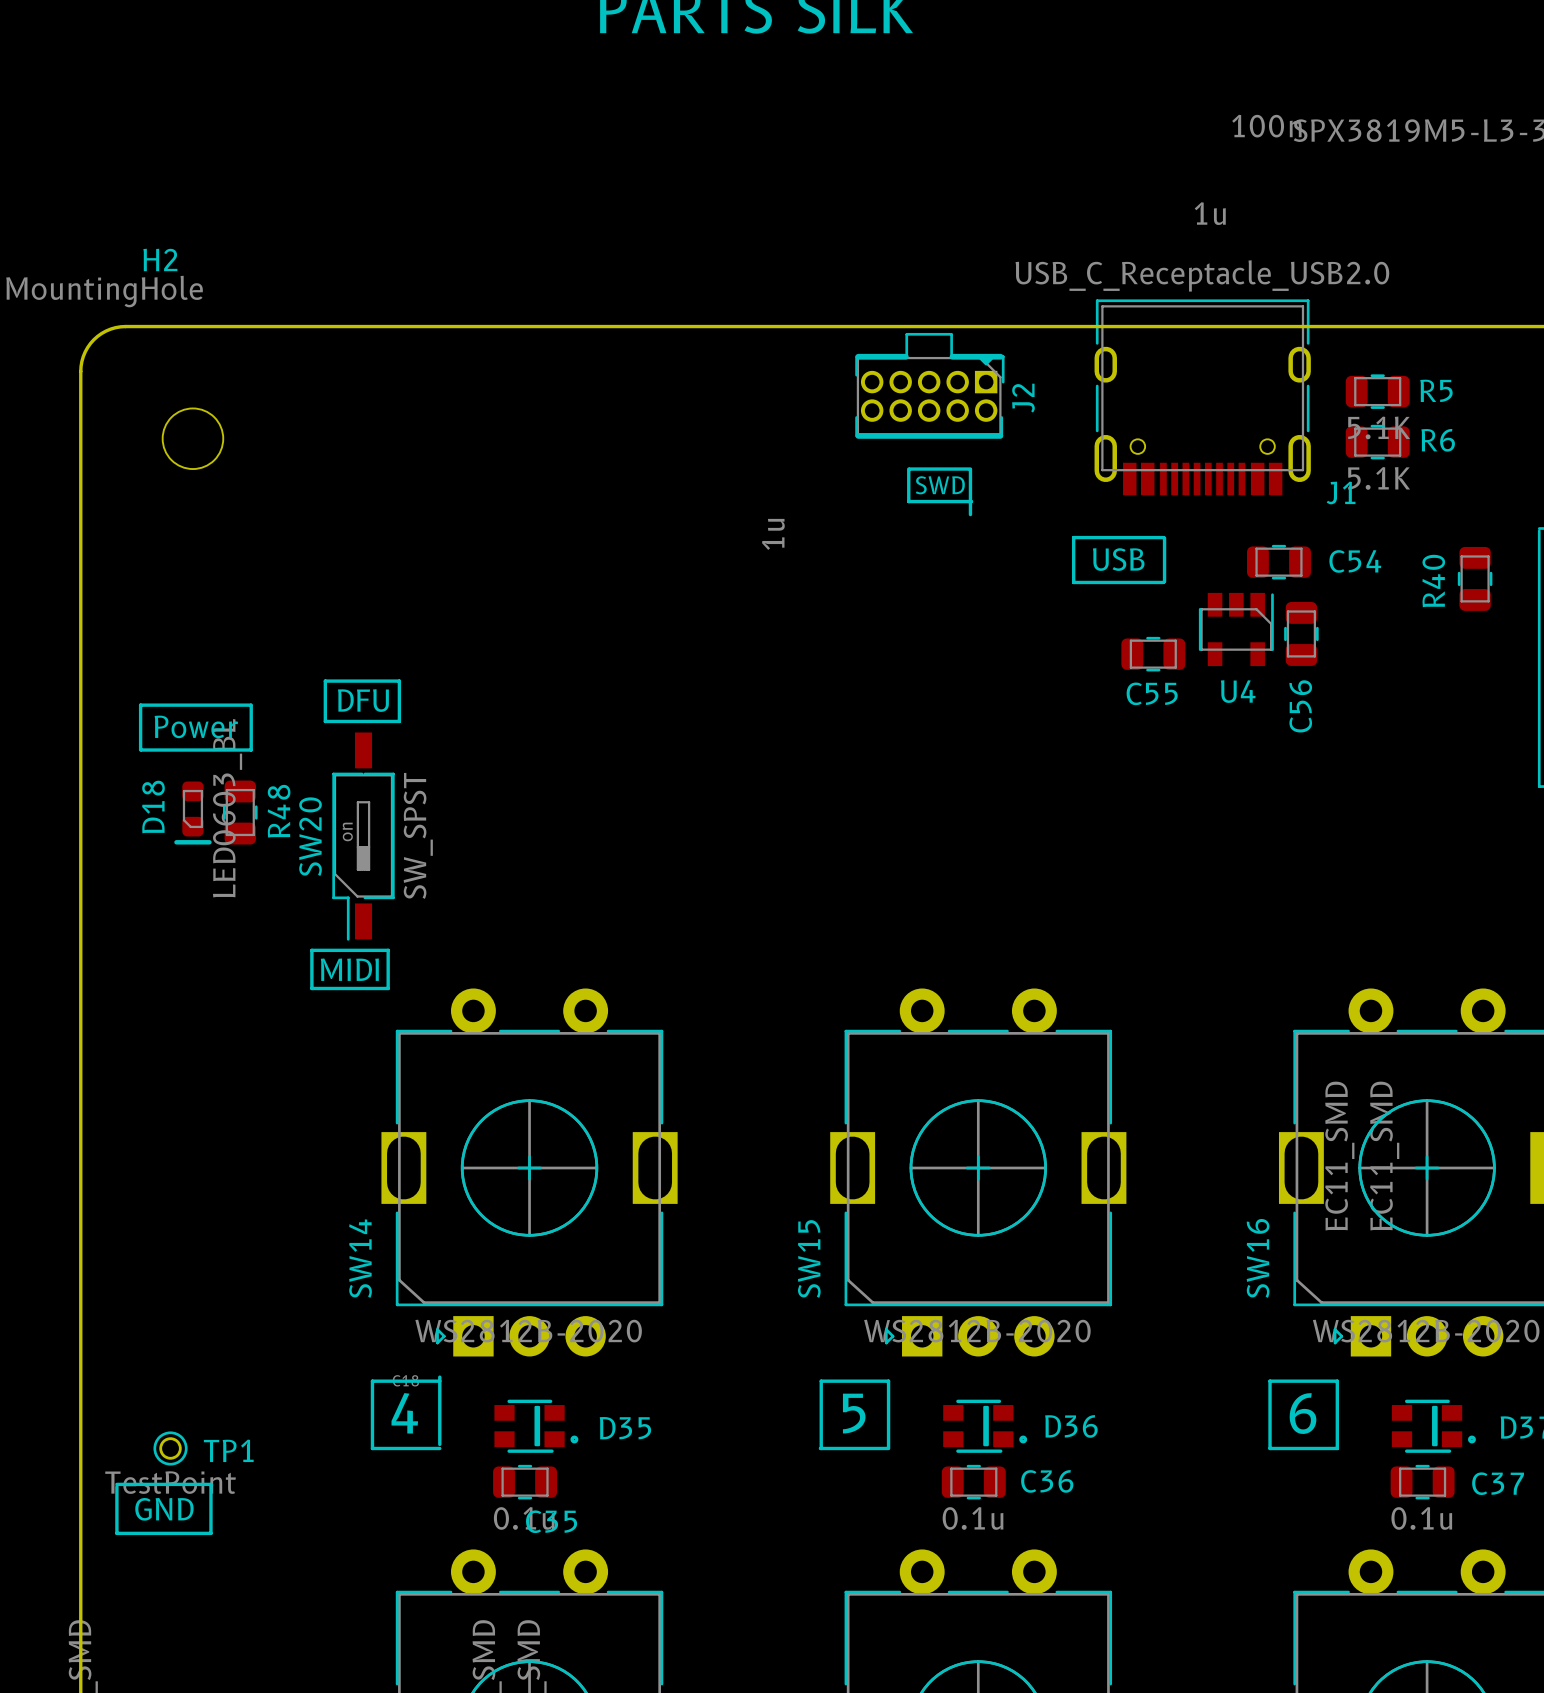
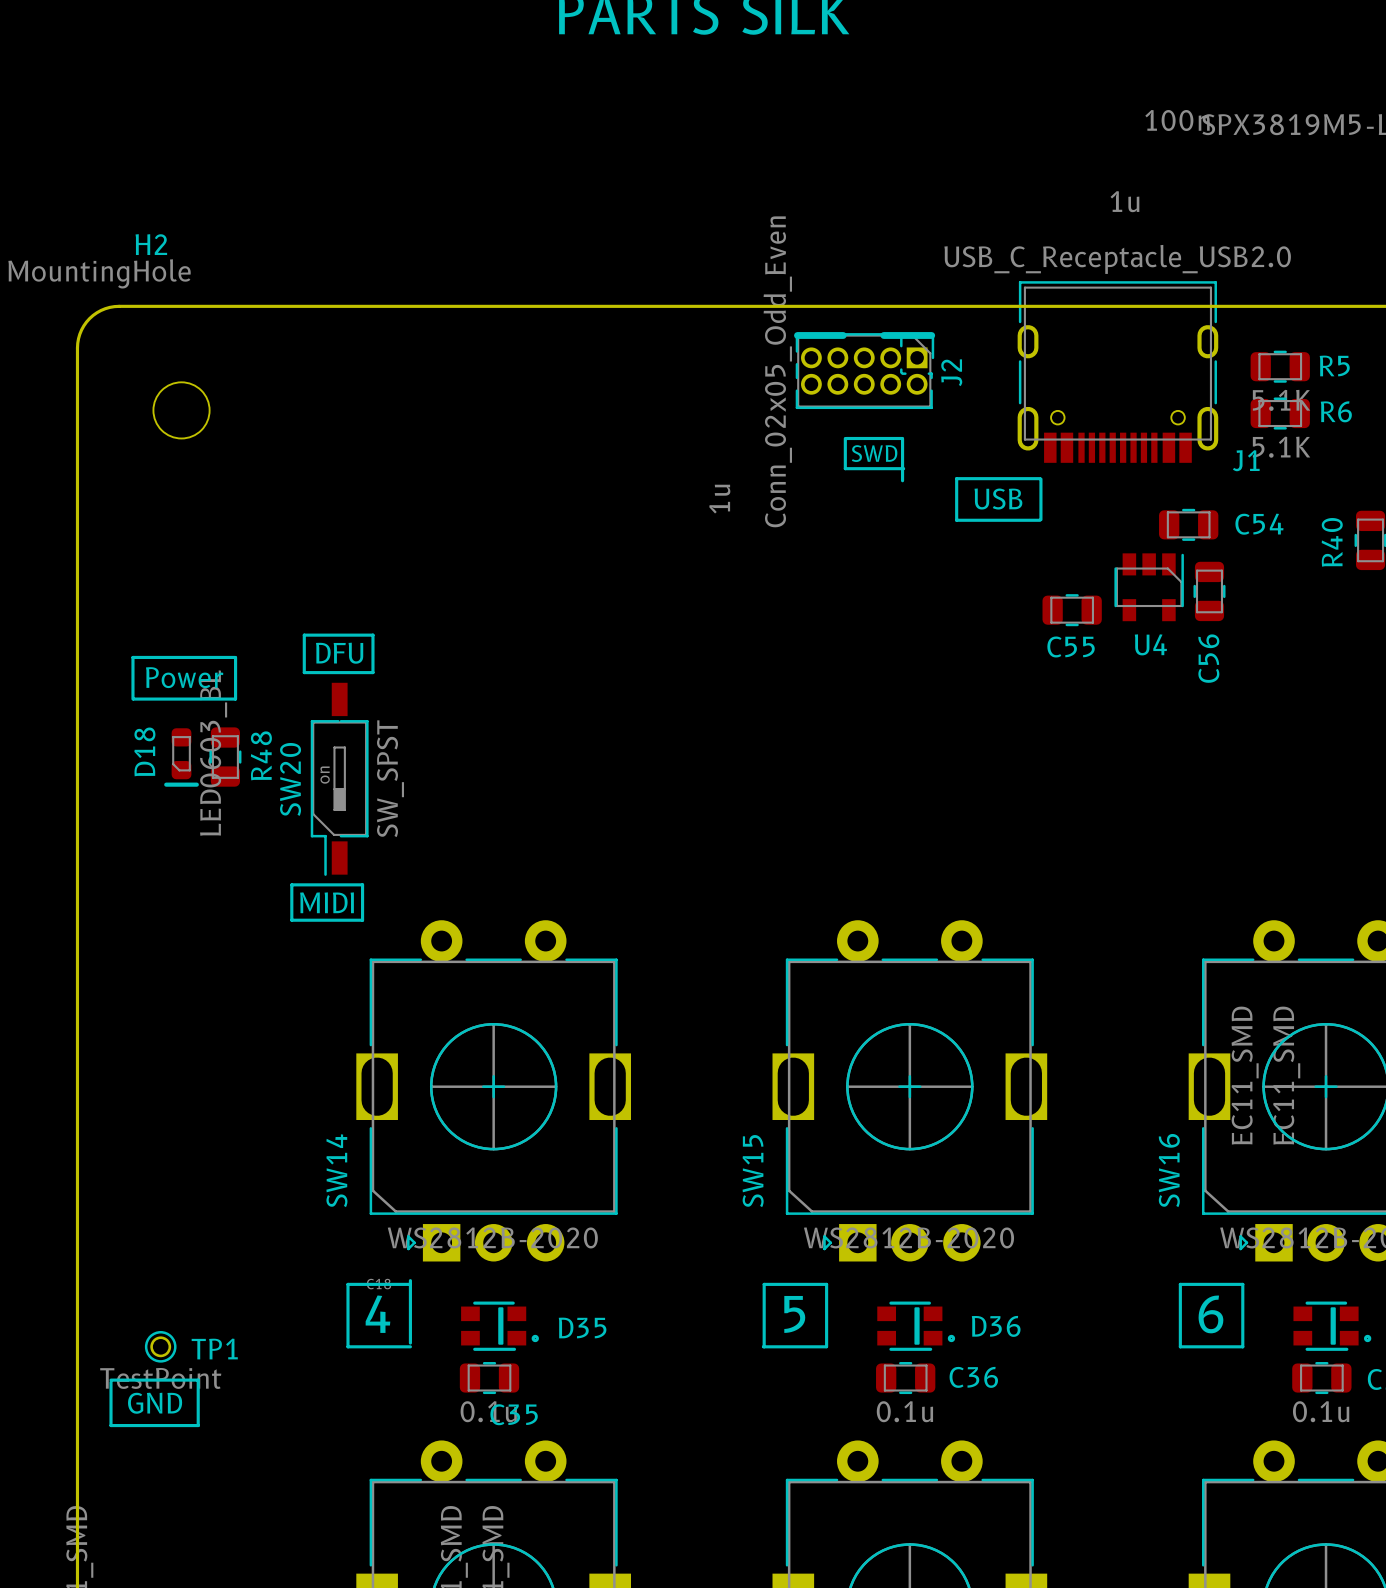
J2 footprint: [855, 332, 1005, 439] -> [795, 333, 935, 410]
line: none -> (797, 335) (843, 335)
line: none -> (883, 335) (931, 335)
J2 value: none -> Conn_02x05_Odd_Even (777, 371)
line: (1163, 537) (1073, 537) (1073, 582) (1163, 582) -> (1039, 478) (956, 478) (956, 520) (1039, 520)
line: (1164, 538) (1164, 581) -> (1040, 479) (1040, 519)
text position: USB (1118, 559) -> USB (998, 499)

